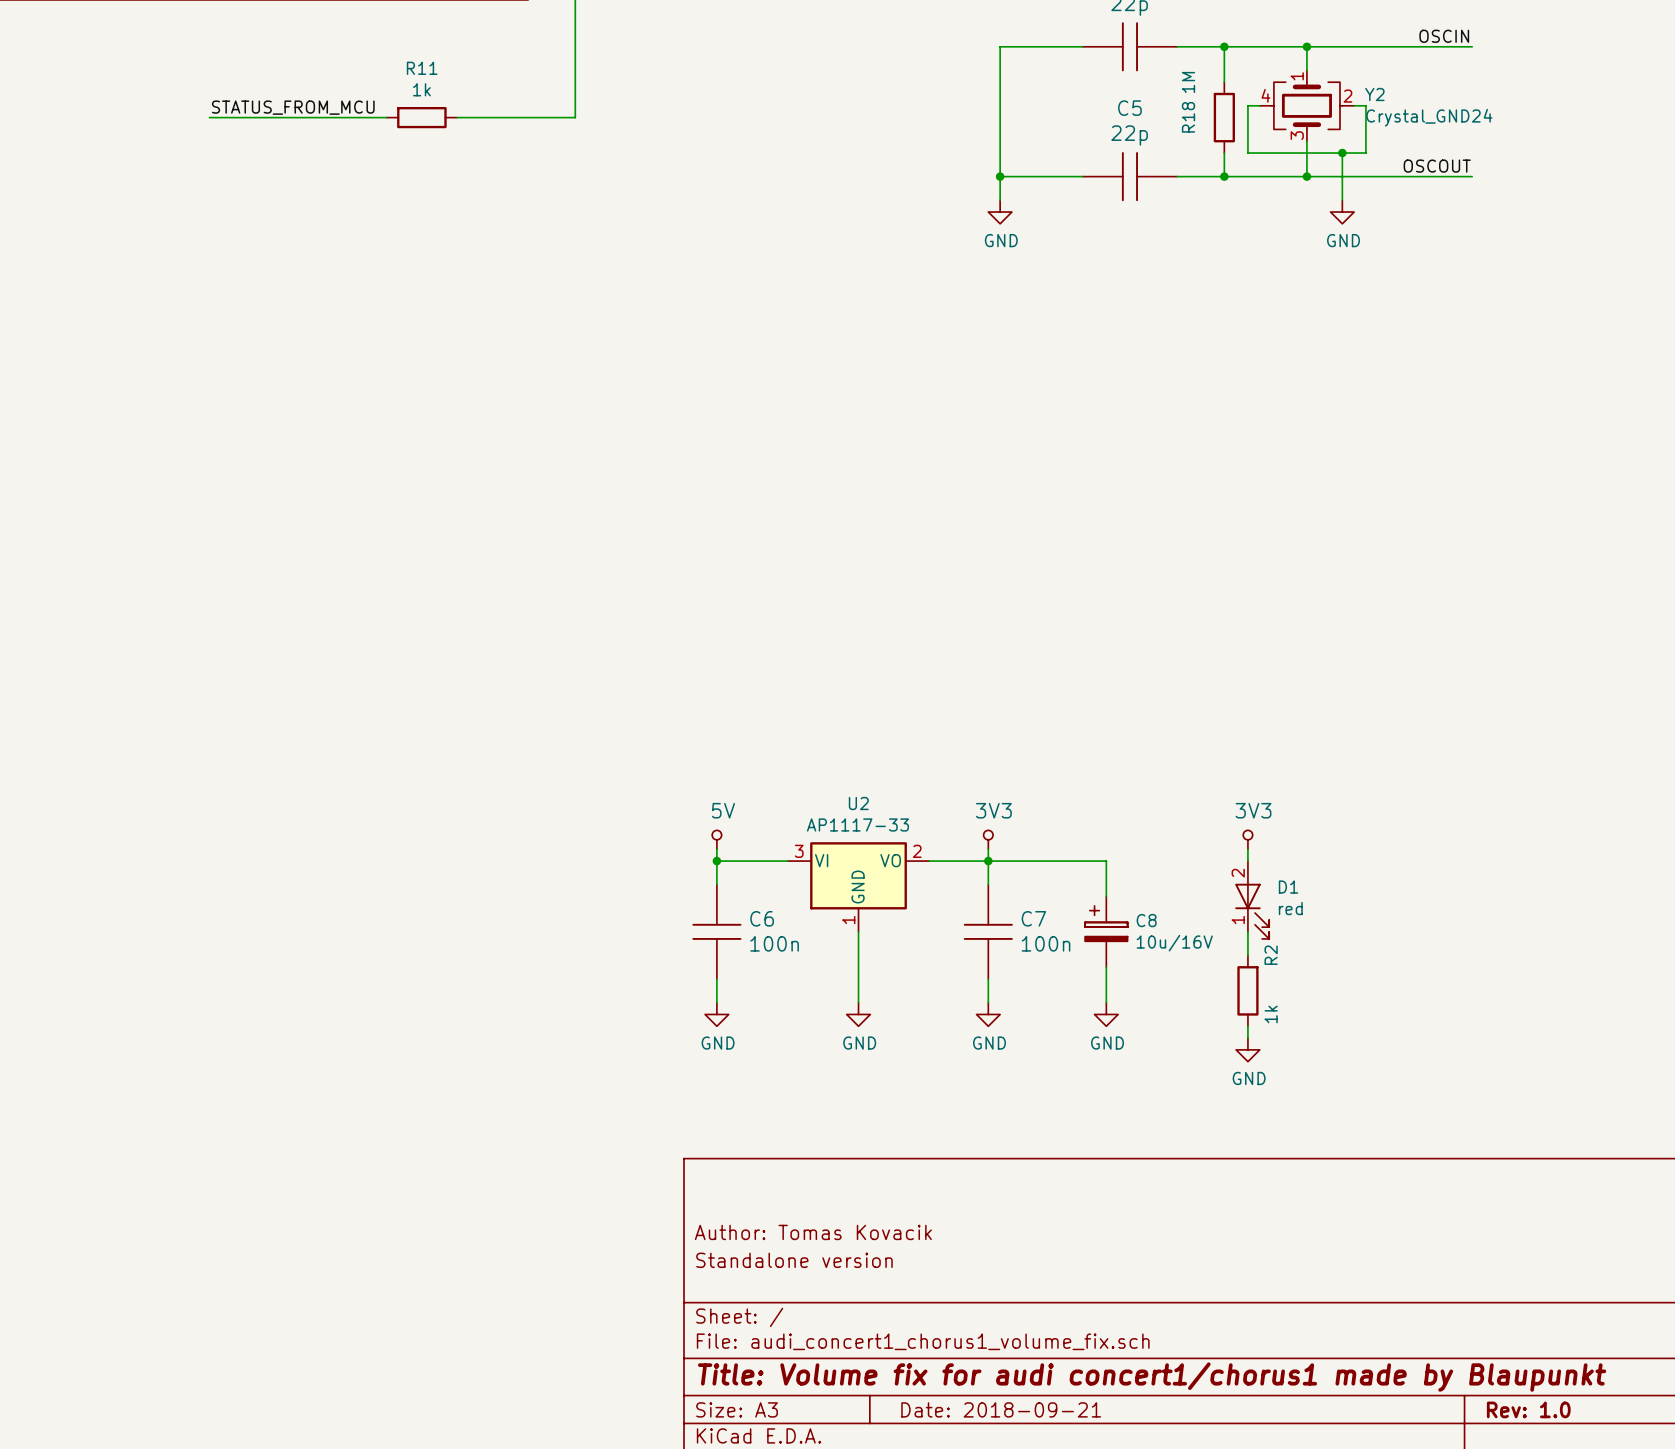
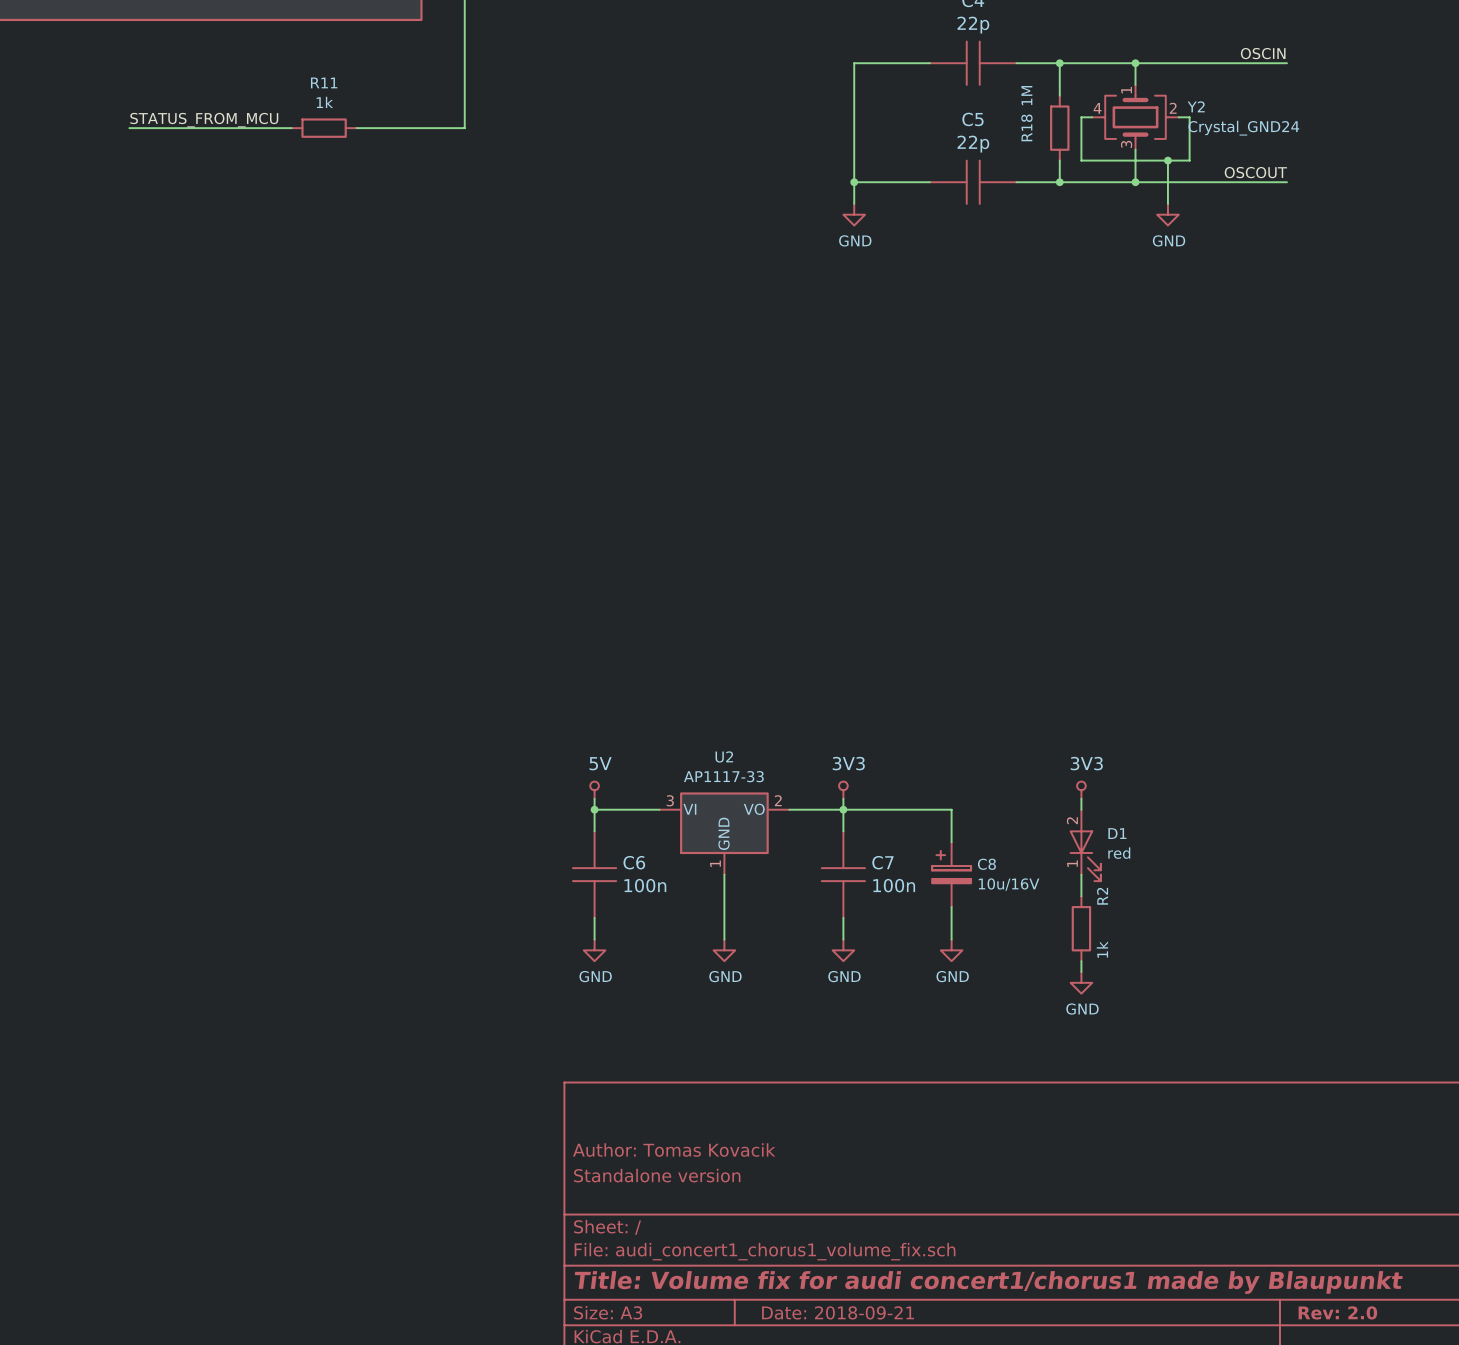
title block: Rev: 1.0 (1528, 1409) -> Rev: 2.0 (1337, 1312)

